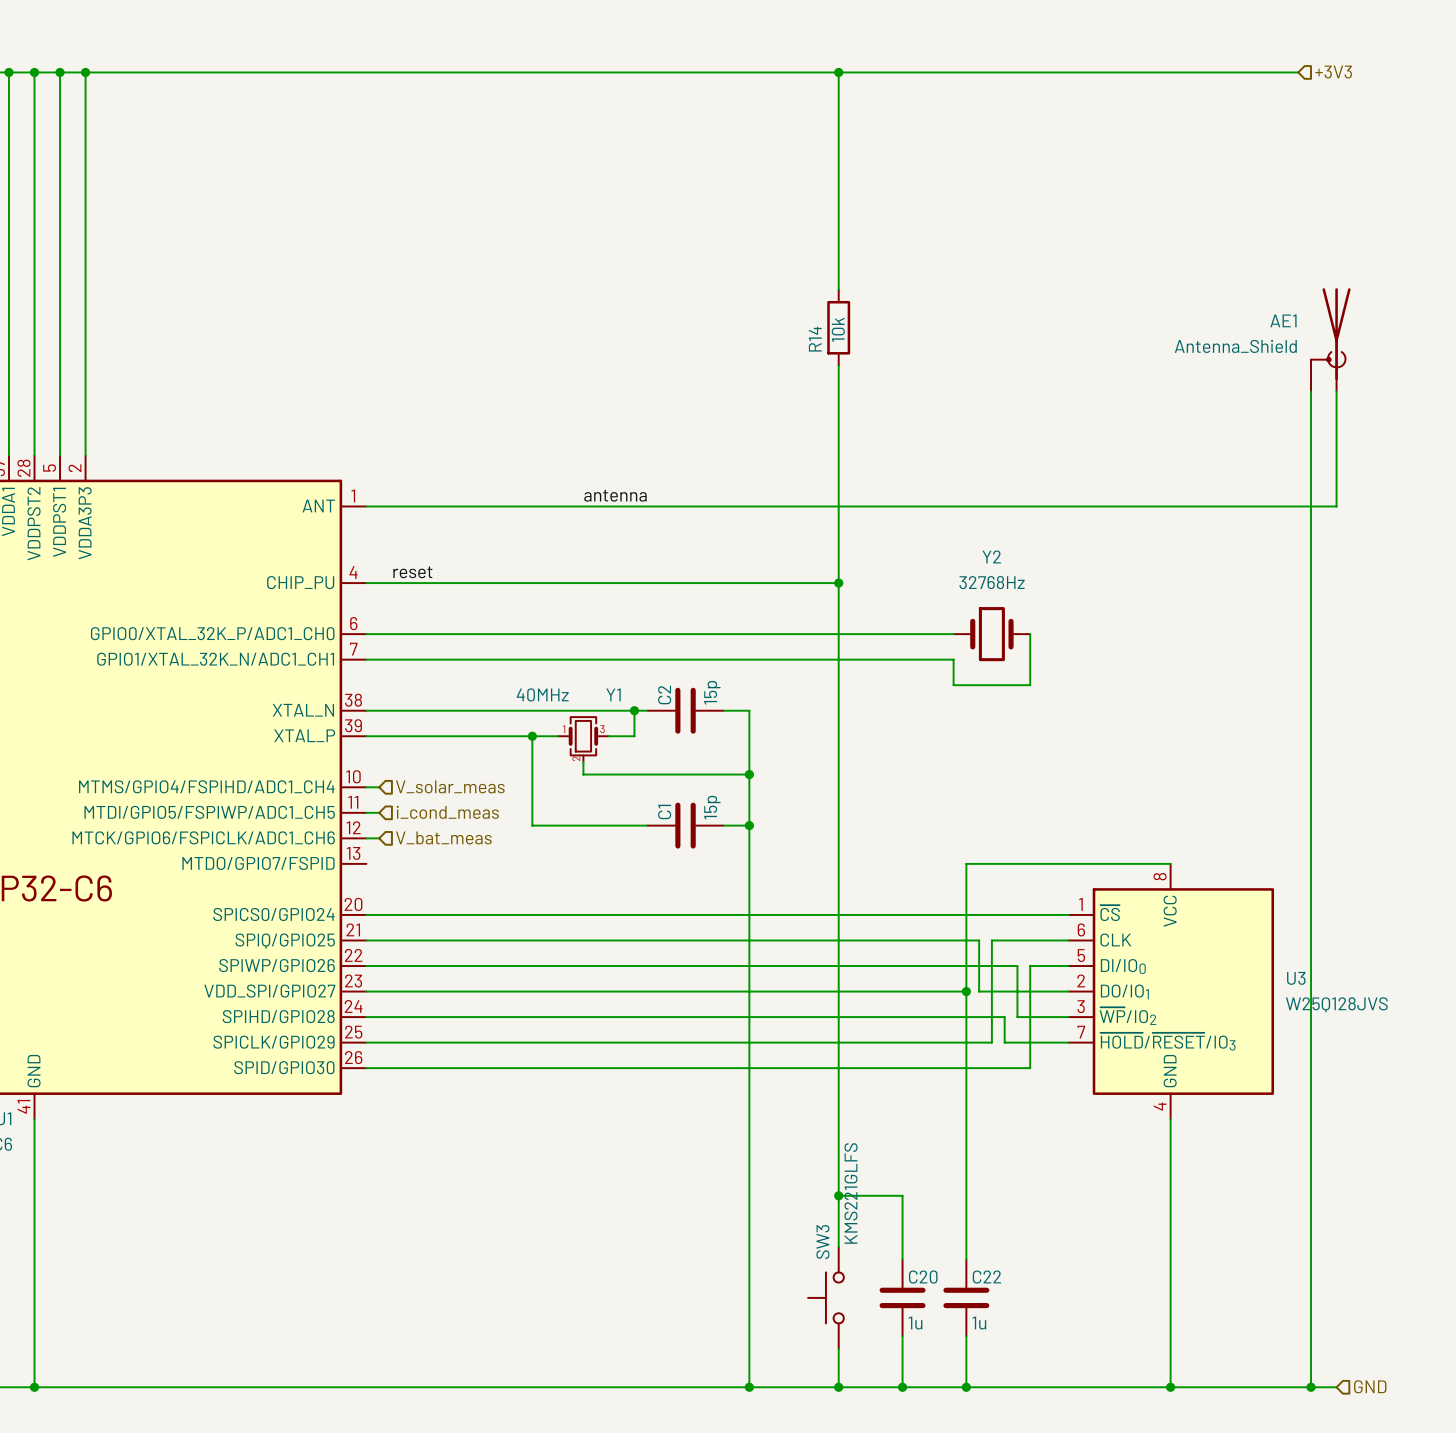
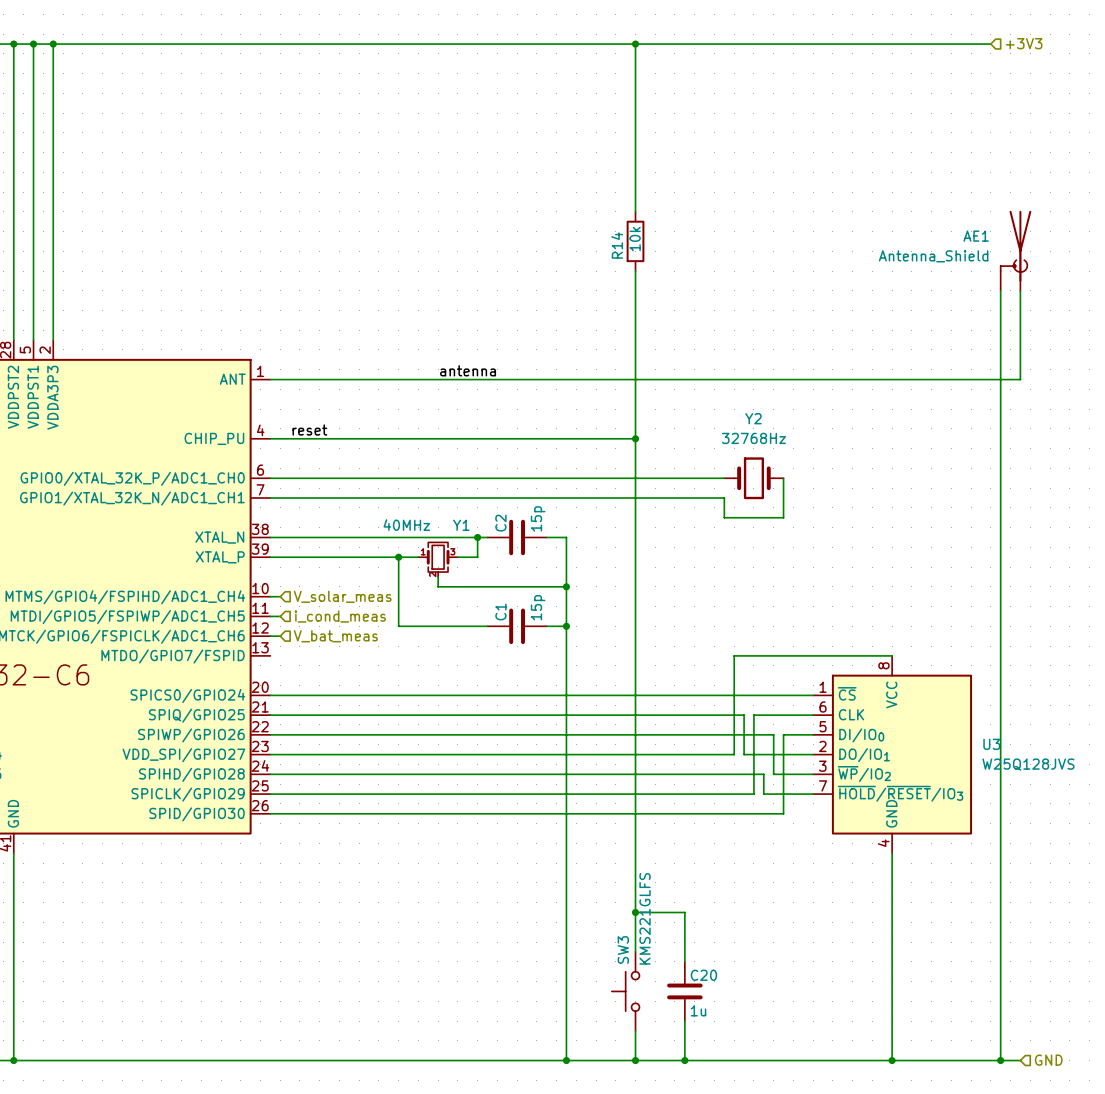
wire: (966, 991) (966, 1259) -> none
junction: (966, 991) -> none
C22: 1u (966, 1297) -> none
wire: (966, 1336) (966, 1387) -> none
junction: (966, 1387) -> none

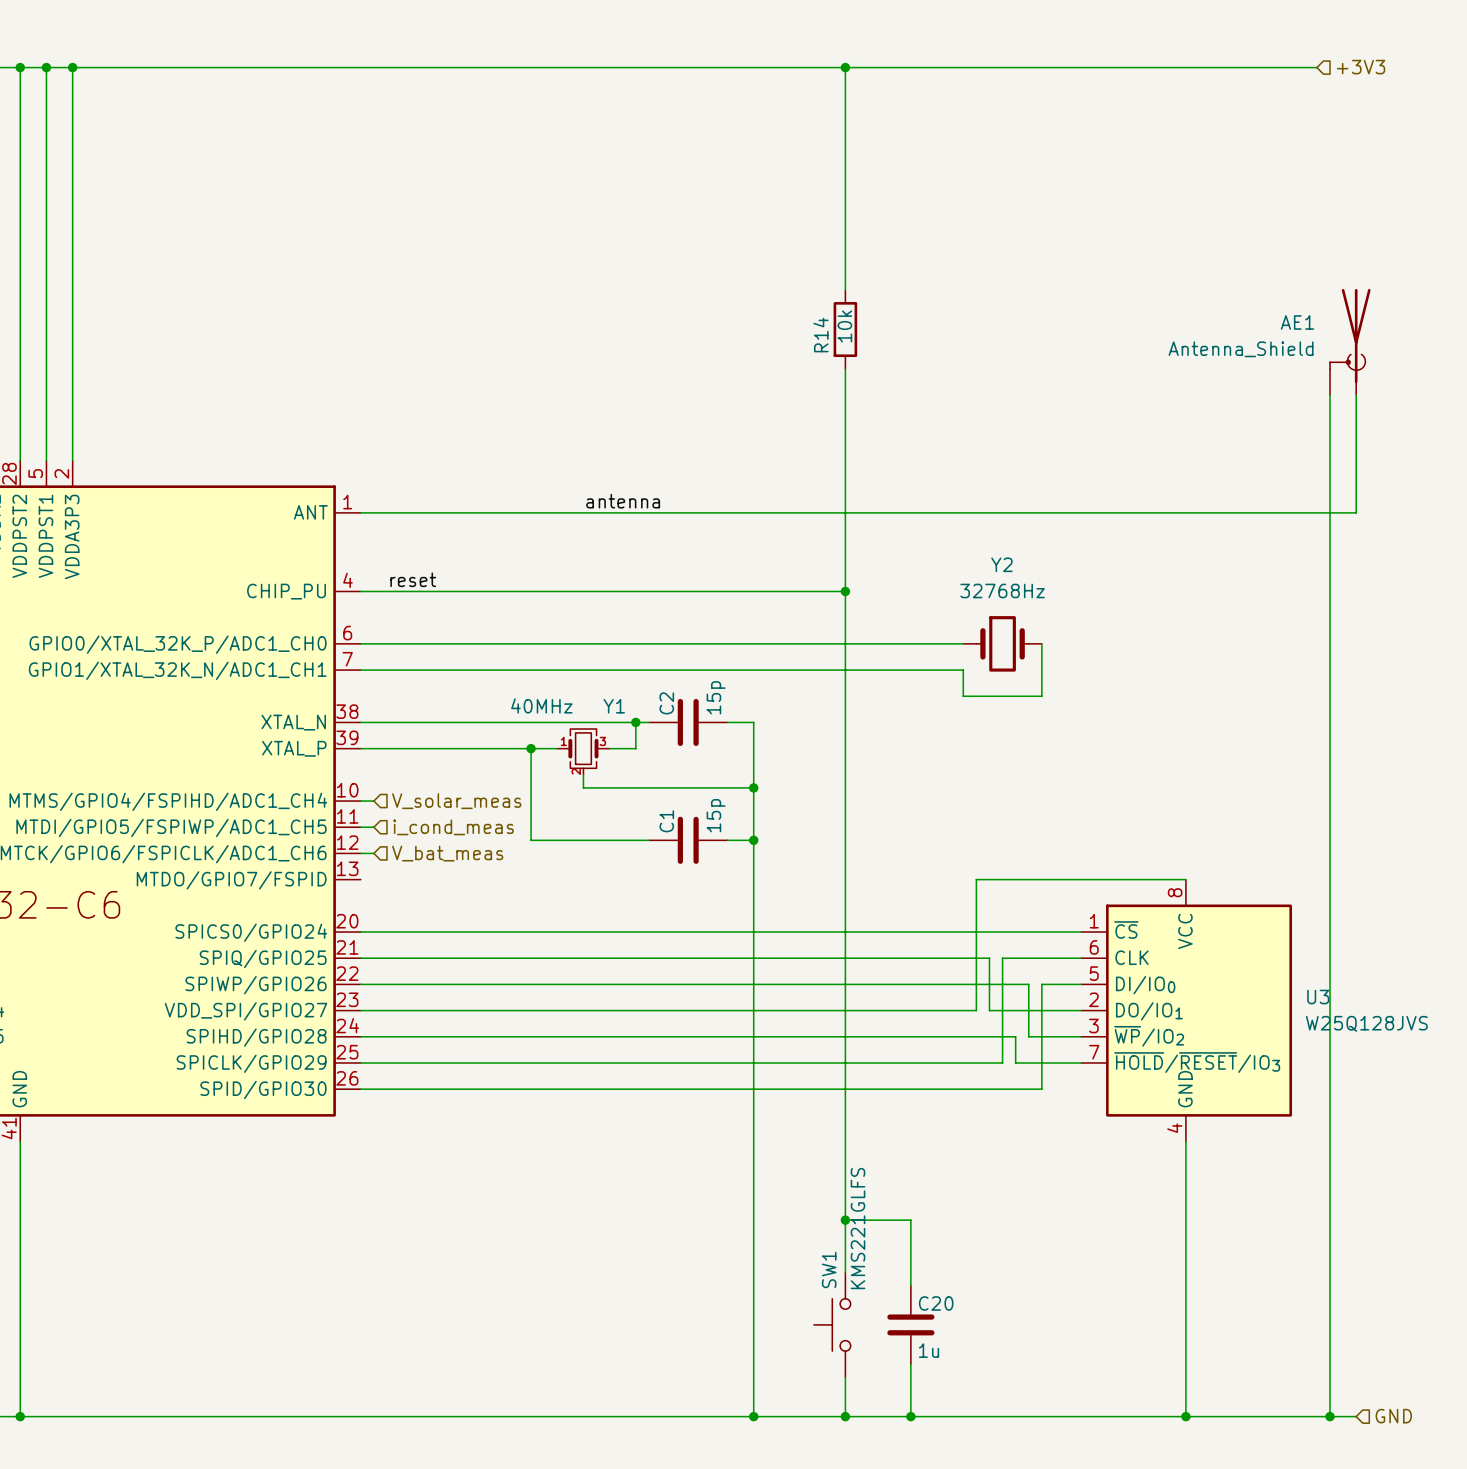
SW3 name: SW3 (623, 950) -> SW1 (829, 1269)

